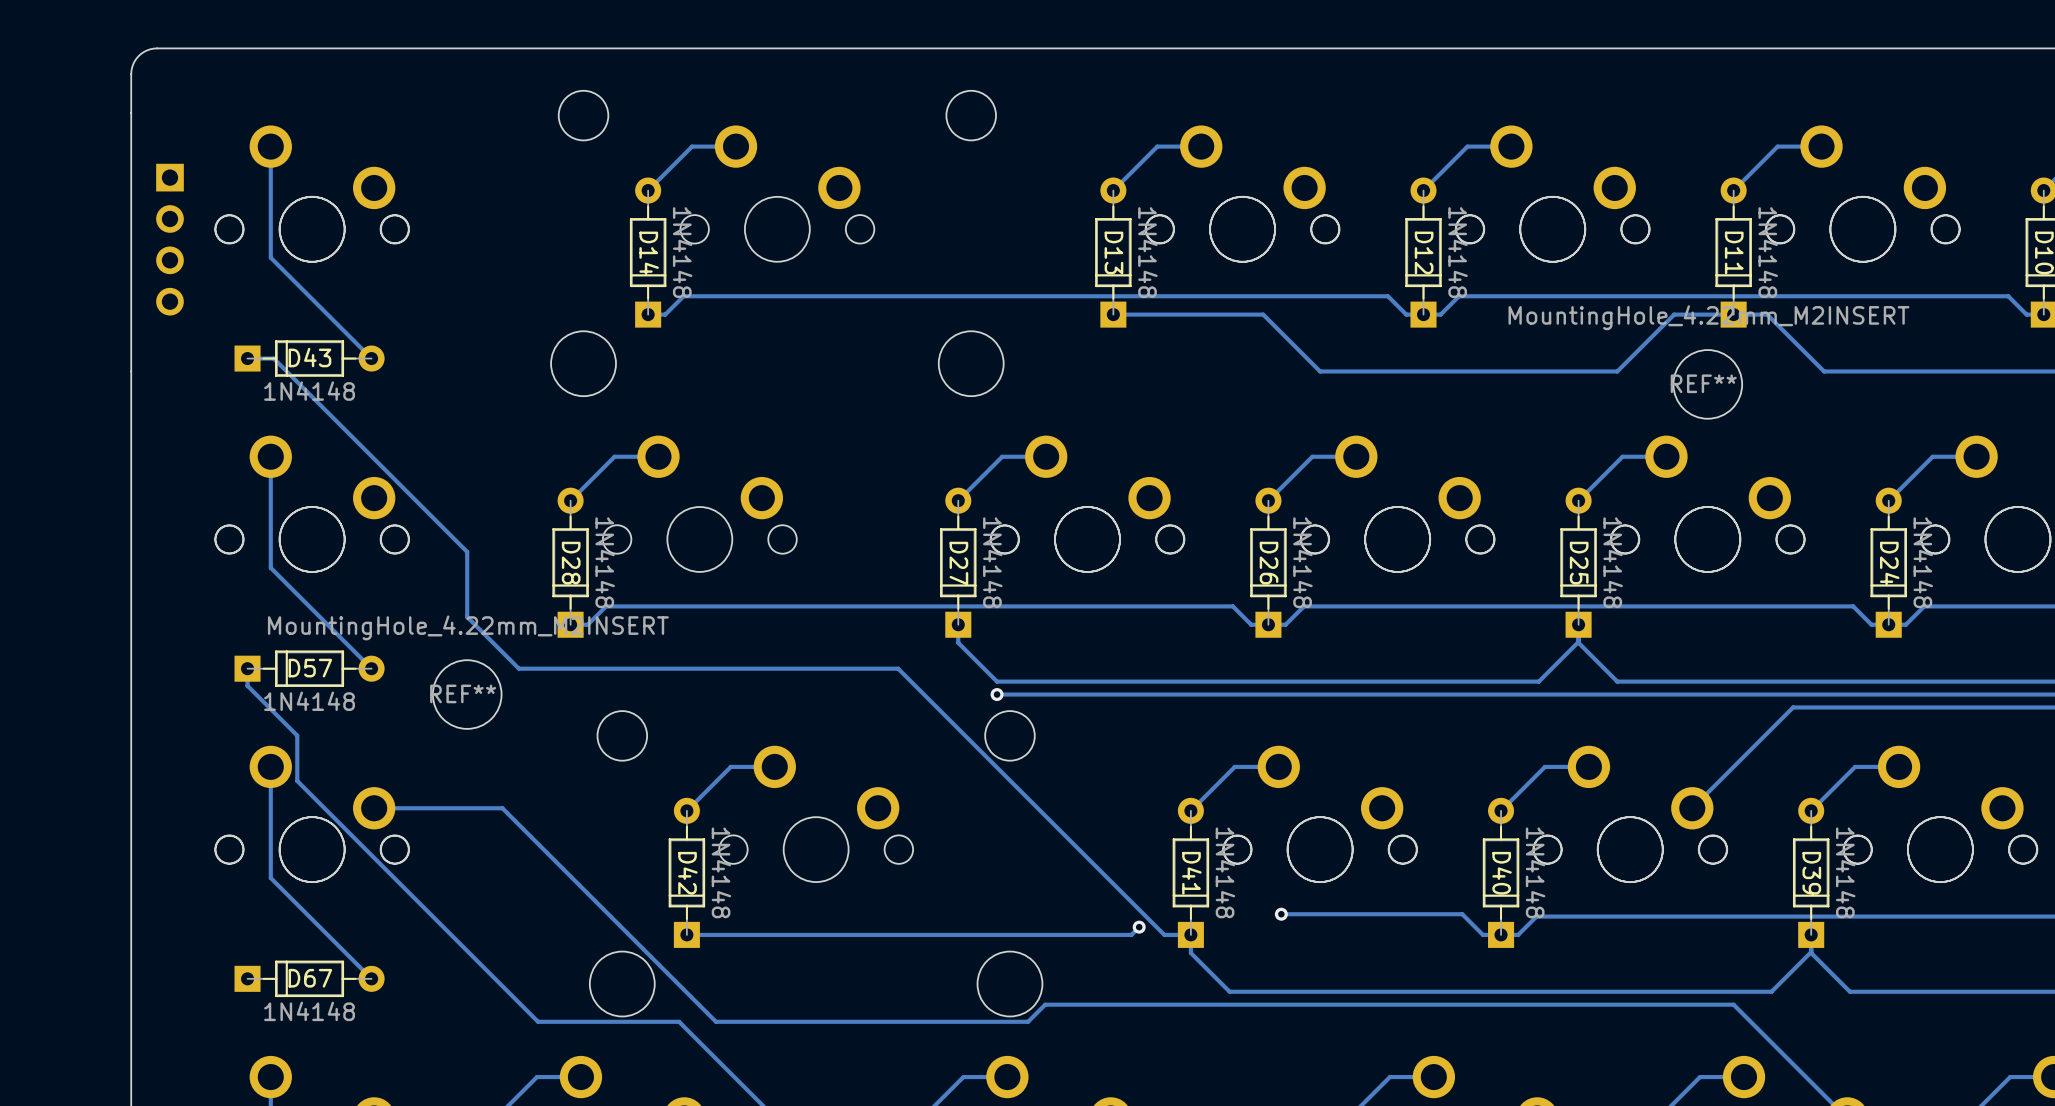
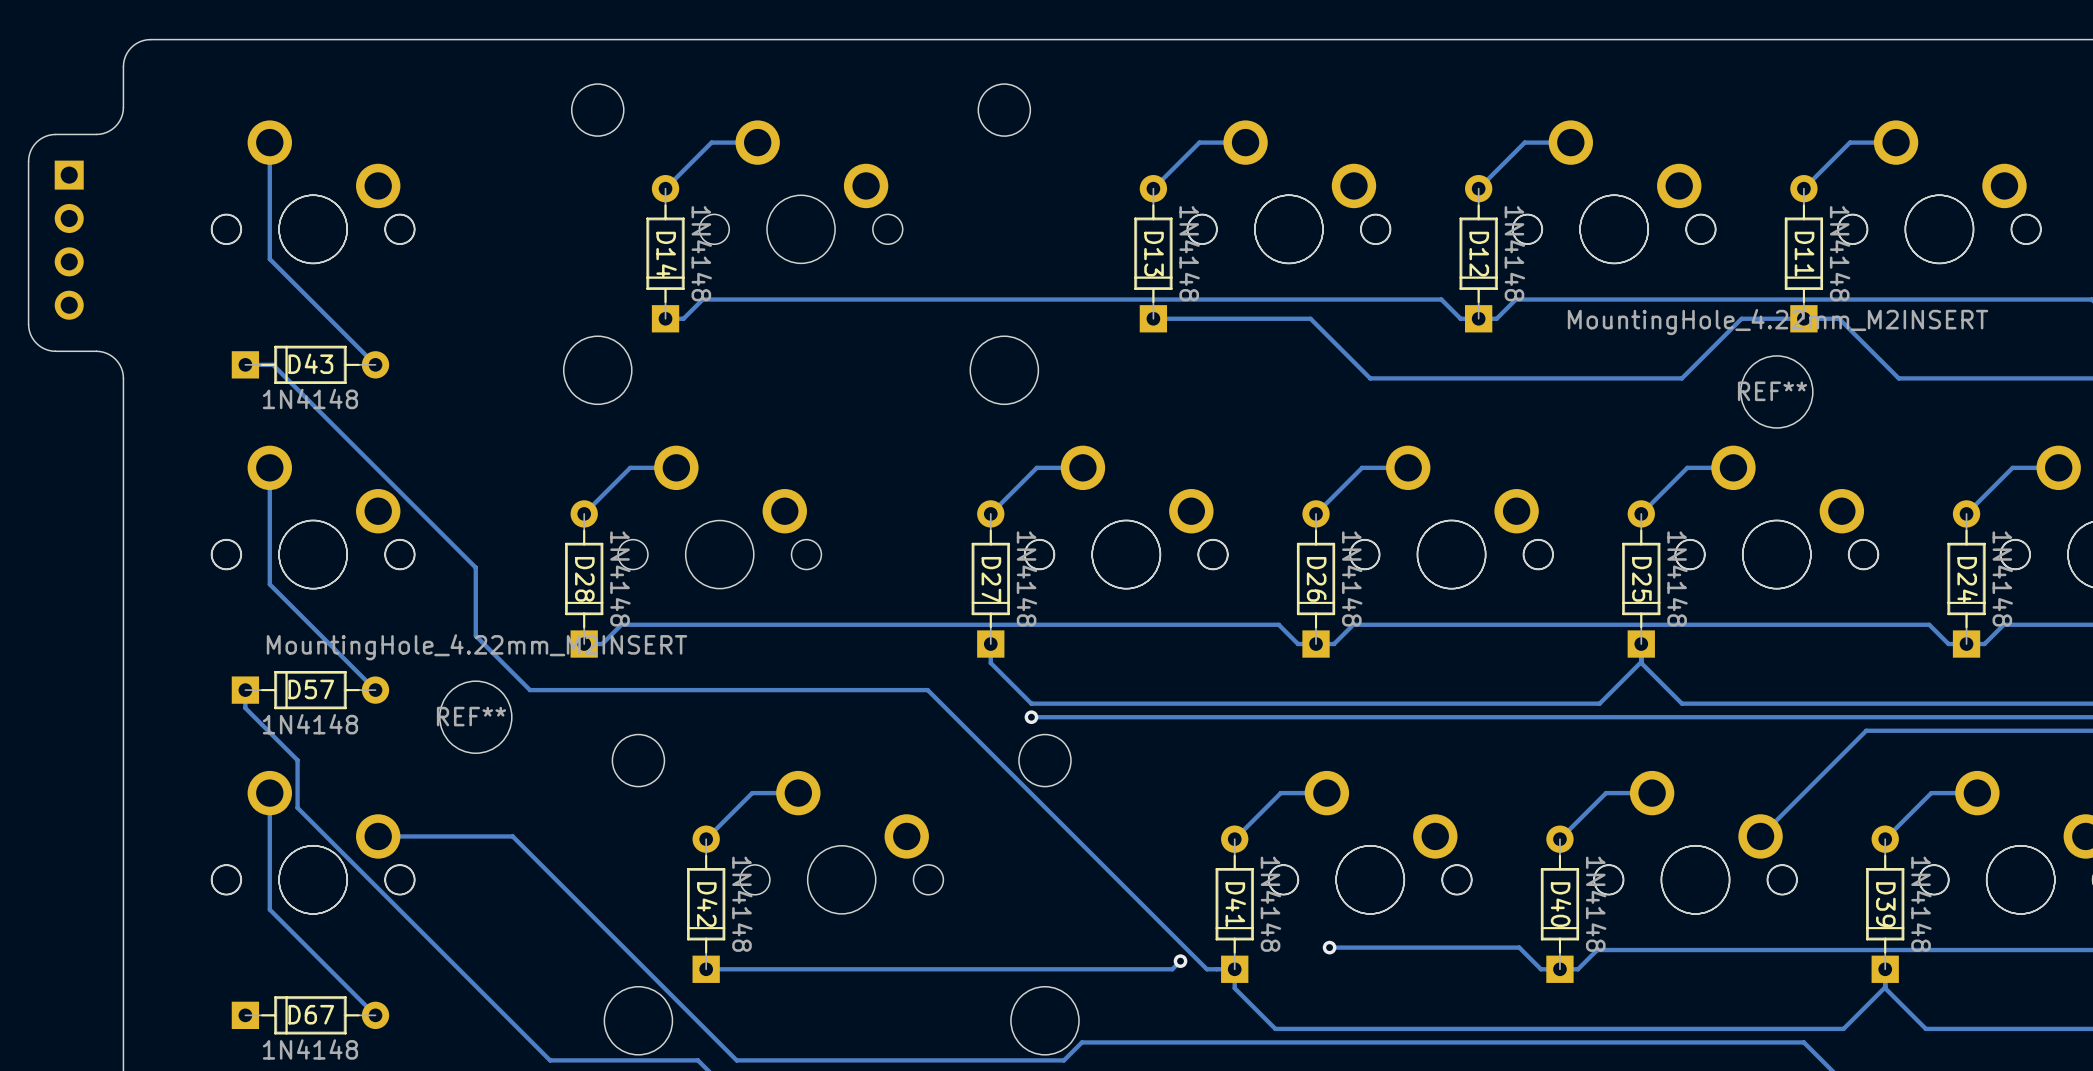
board edge: (131, 113) (131, 371) -> (123, 107) (119, 120) (106, 132) (96, 134) (48, 135) (39, 140) (30, 151) (28, 161) (28, 324)
part position: (169, 239) -> (69, 240)
board edge: none -> (28, 324) (34, 340) (45, 349) (55, 351) (99, 351) (109, 354) (119, 364) (123, 378)

